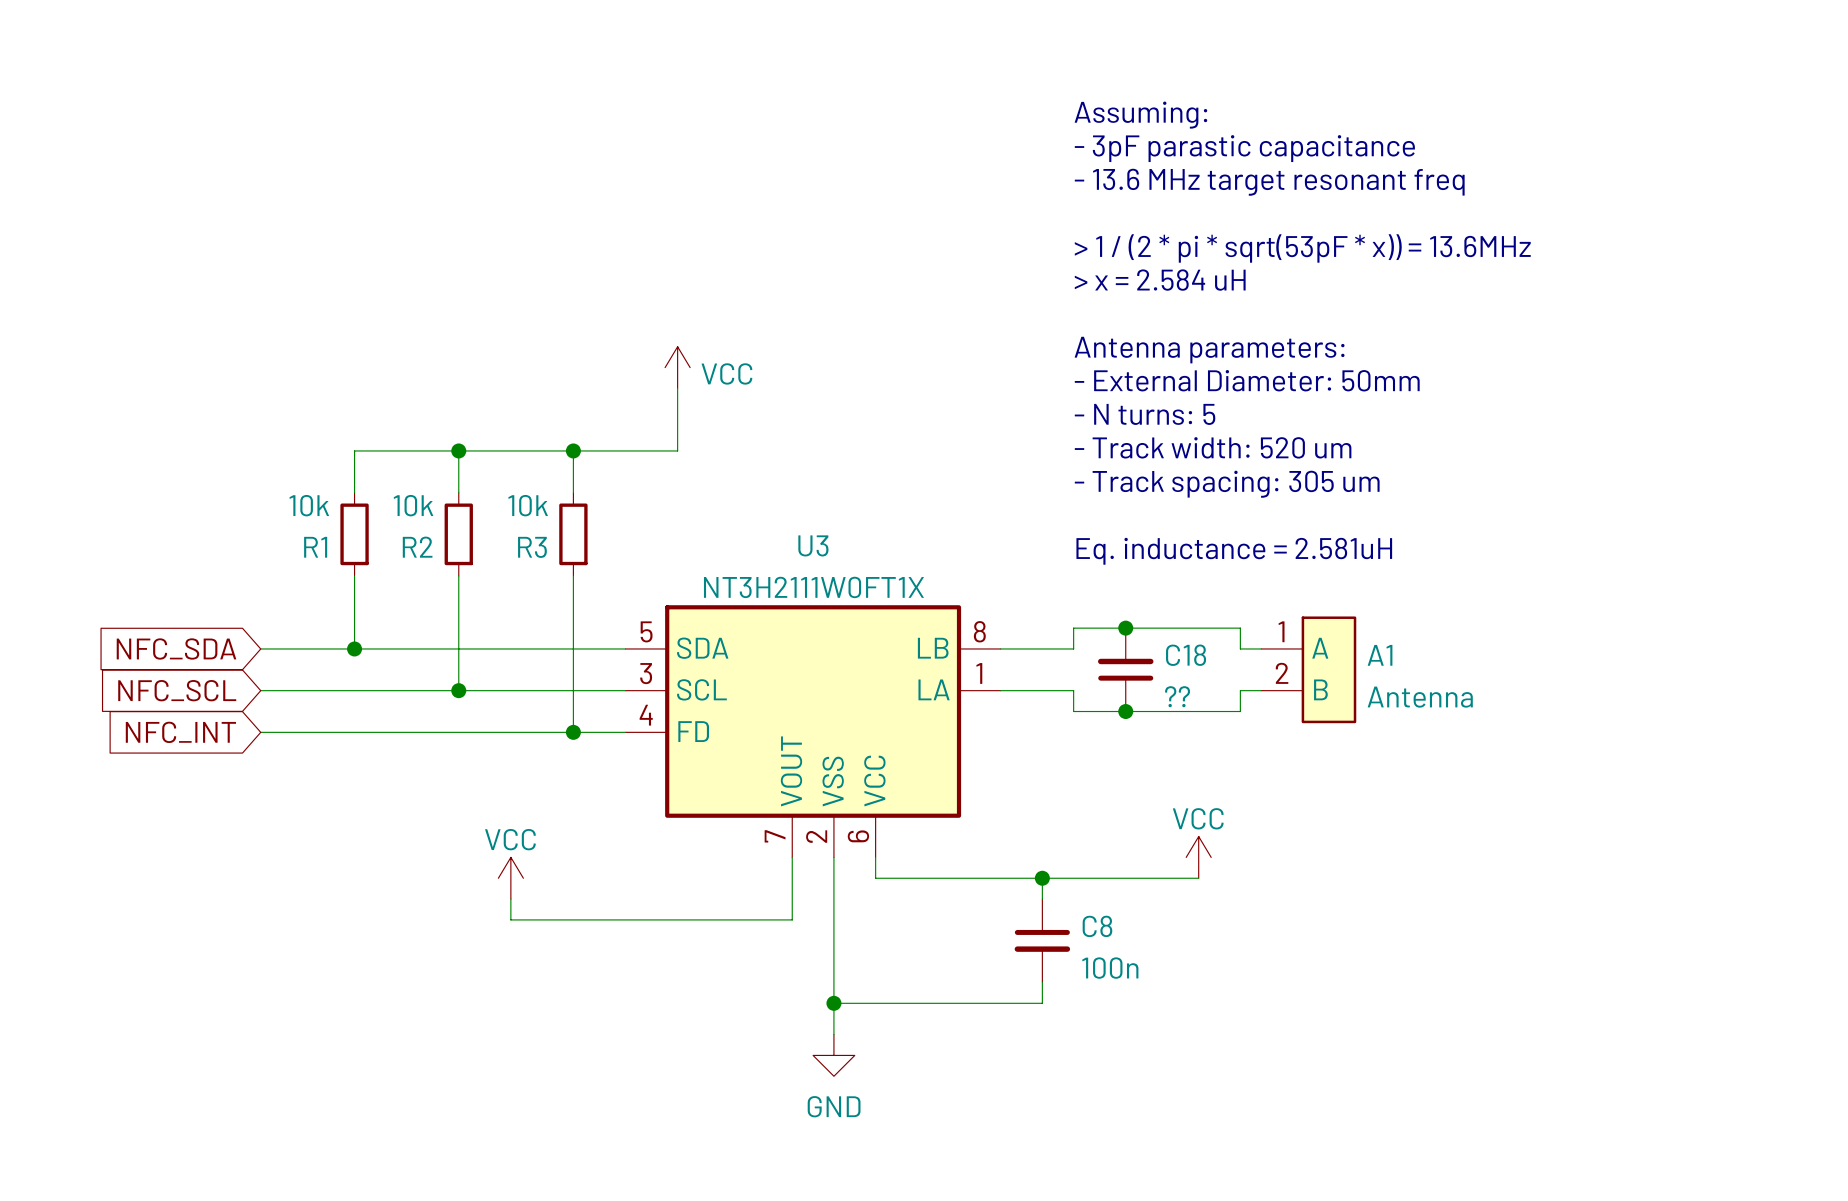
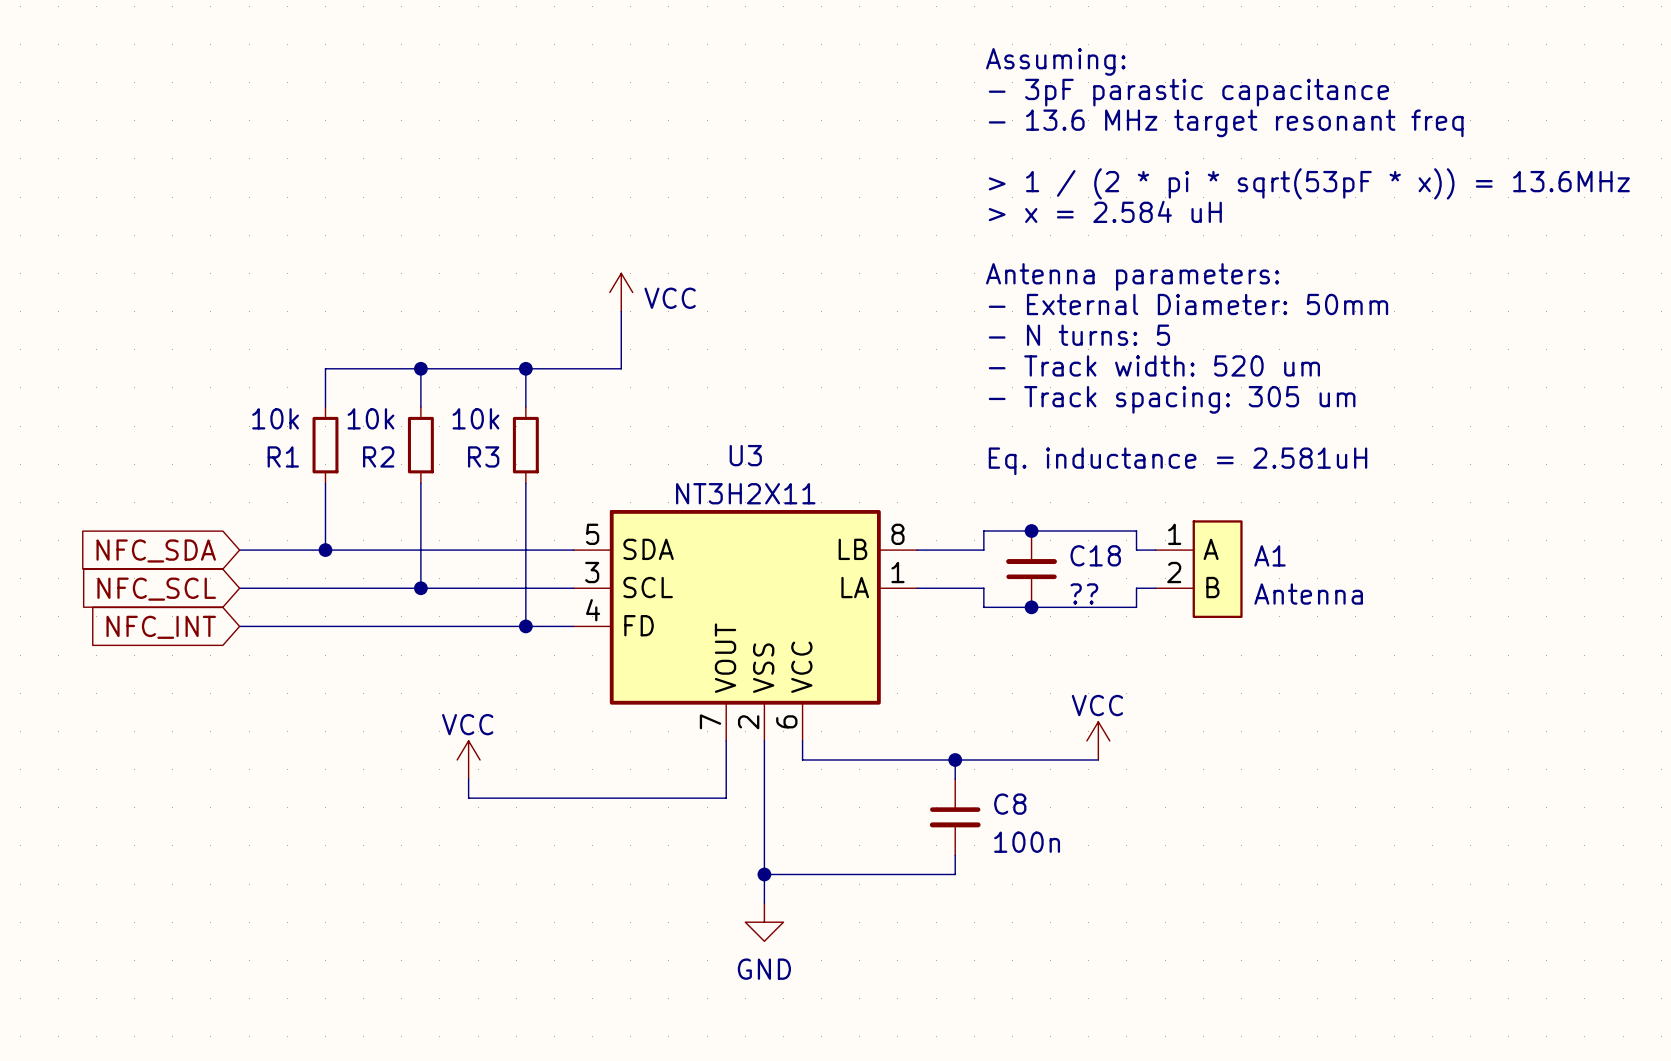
U3 value: NT3H2111W0FT1X (813, 587) -> NT3H2X11 (745, 493)

